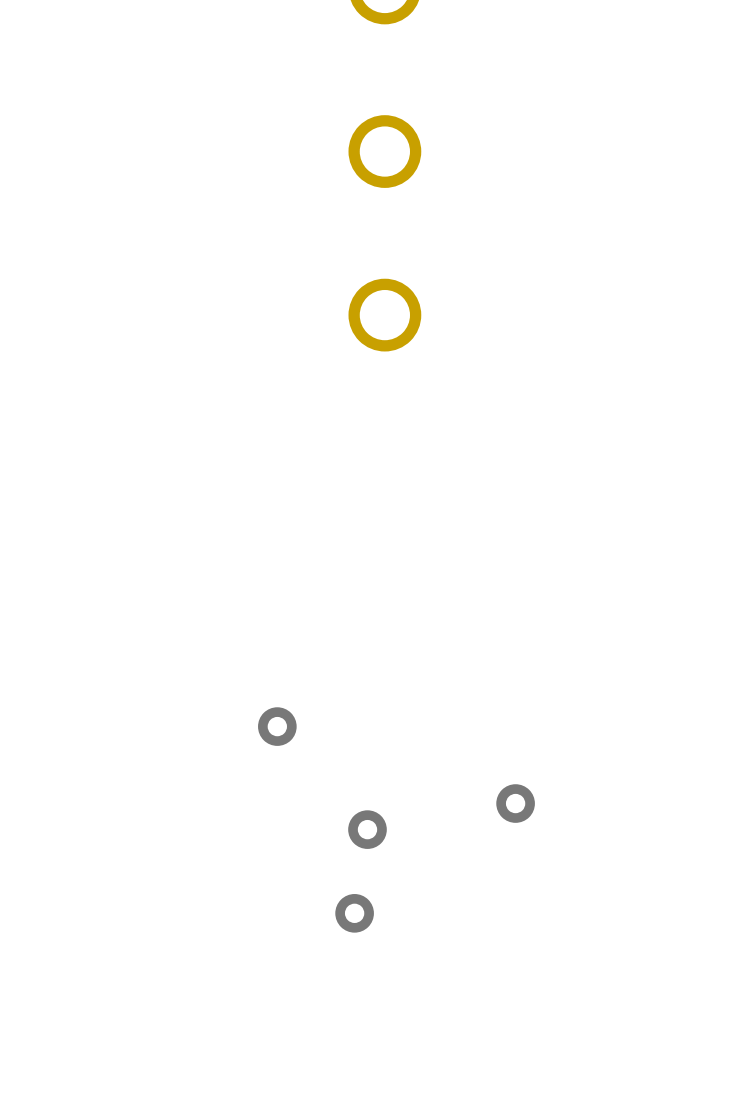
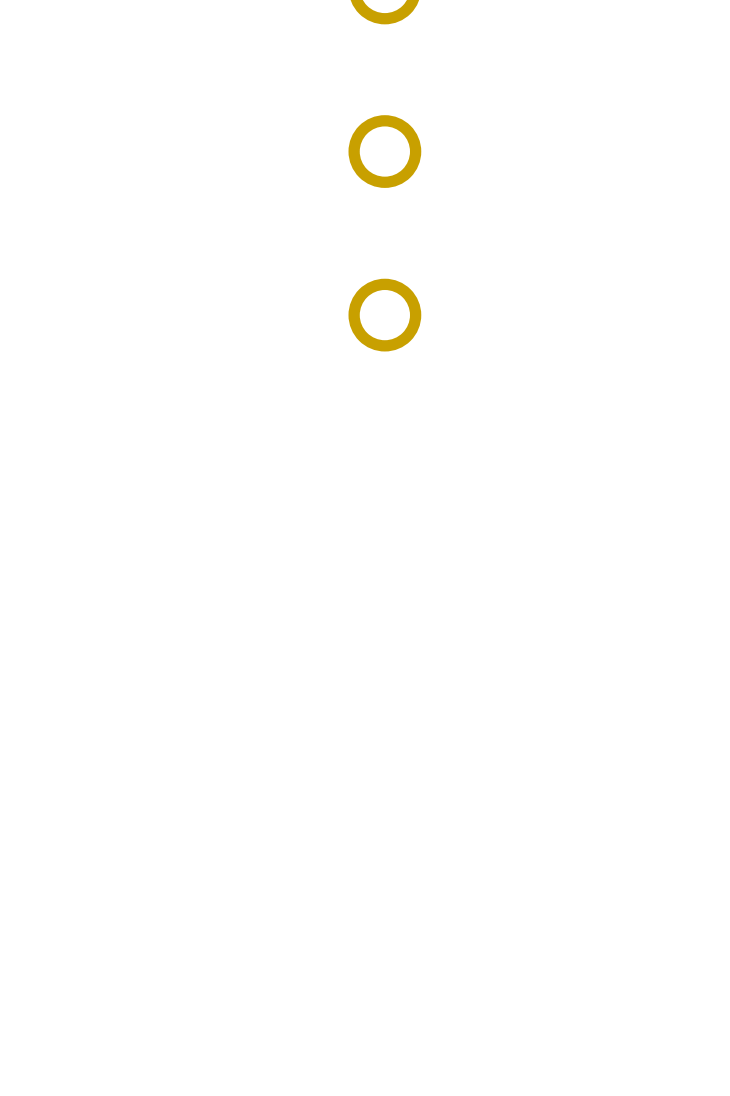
via: (277, 726) -> none
via: (515, 803) -> none
via: (367, 829) -> none
via: (354, 913) -> none

